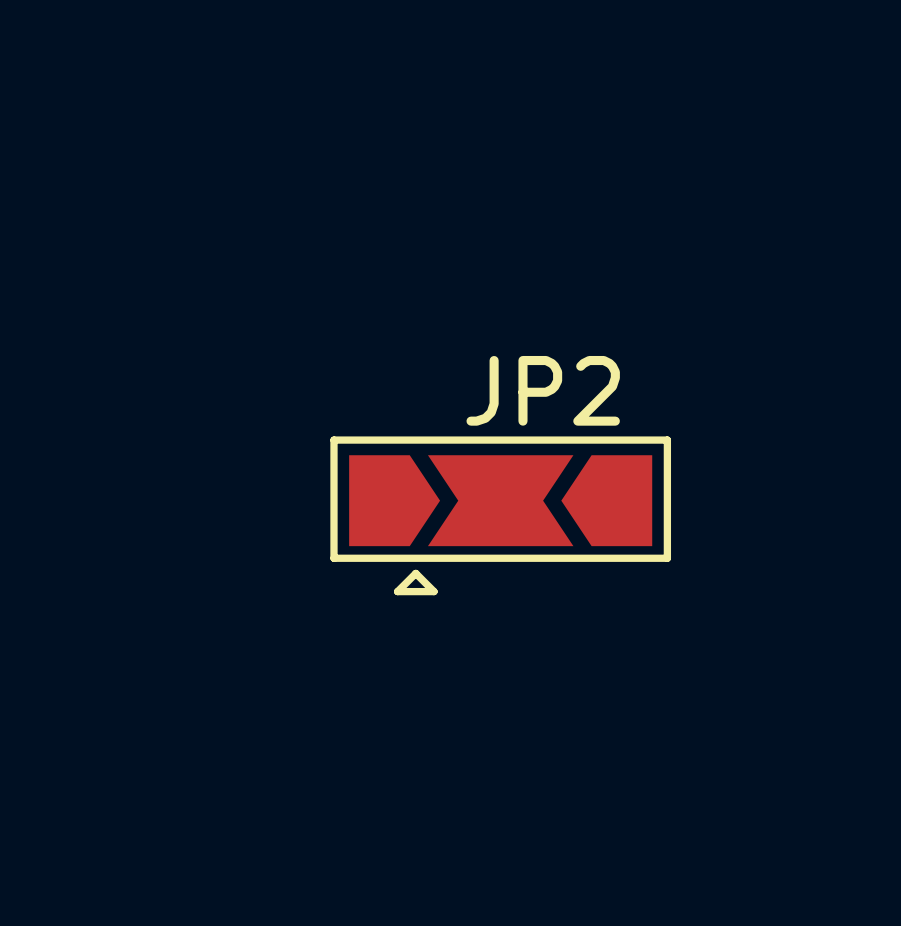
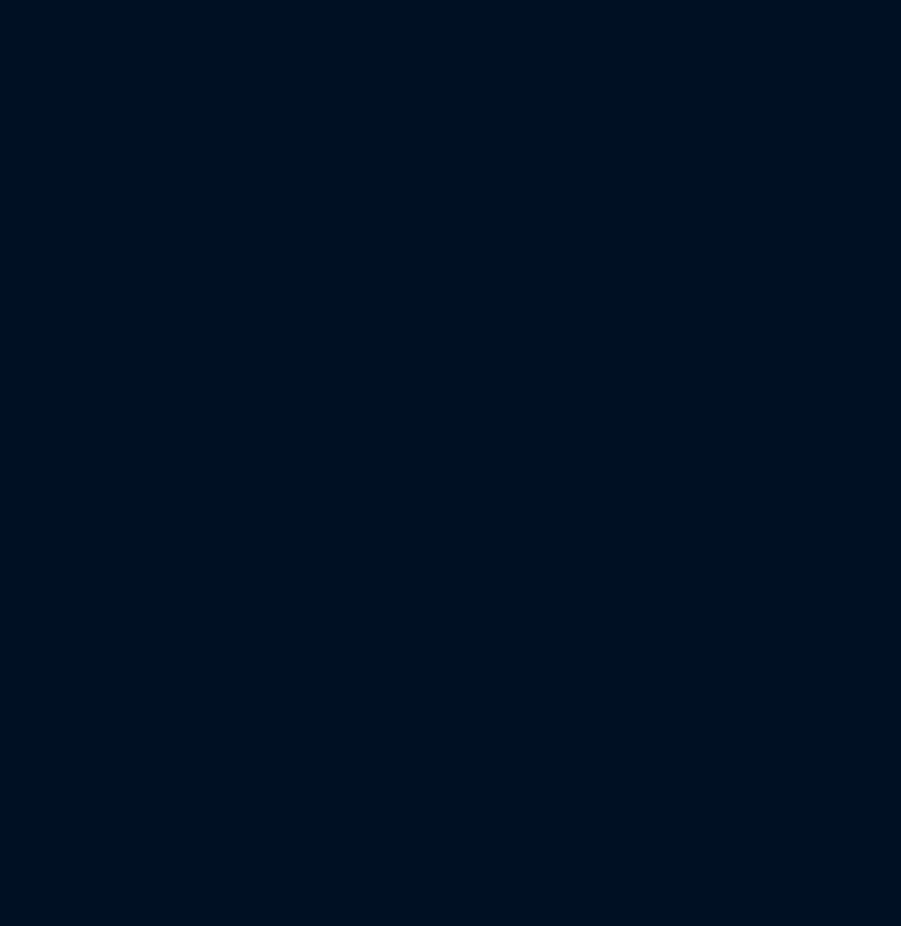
JP2: (500, 515) -> none

